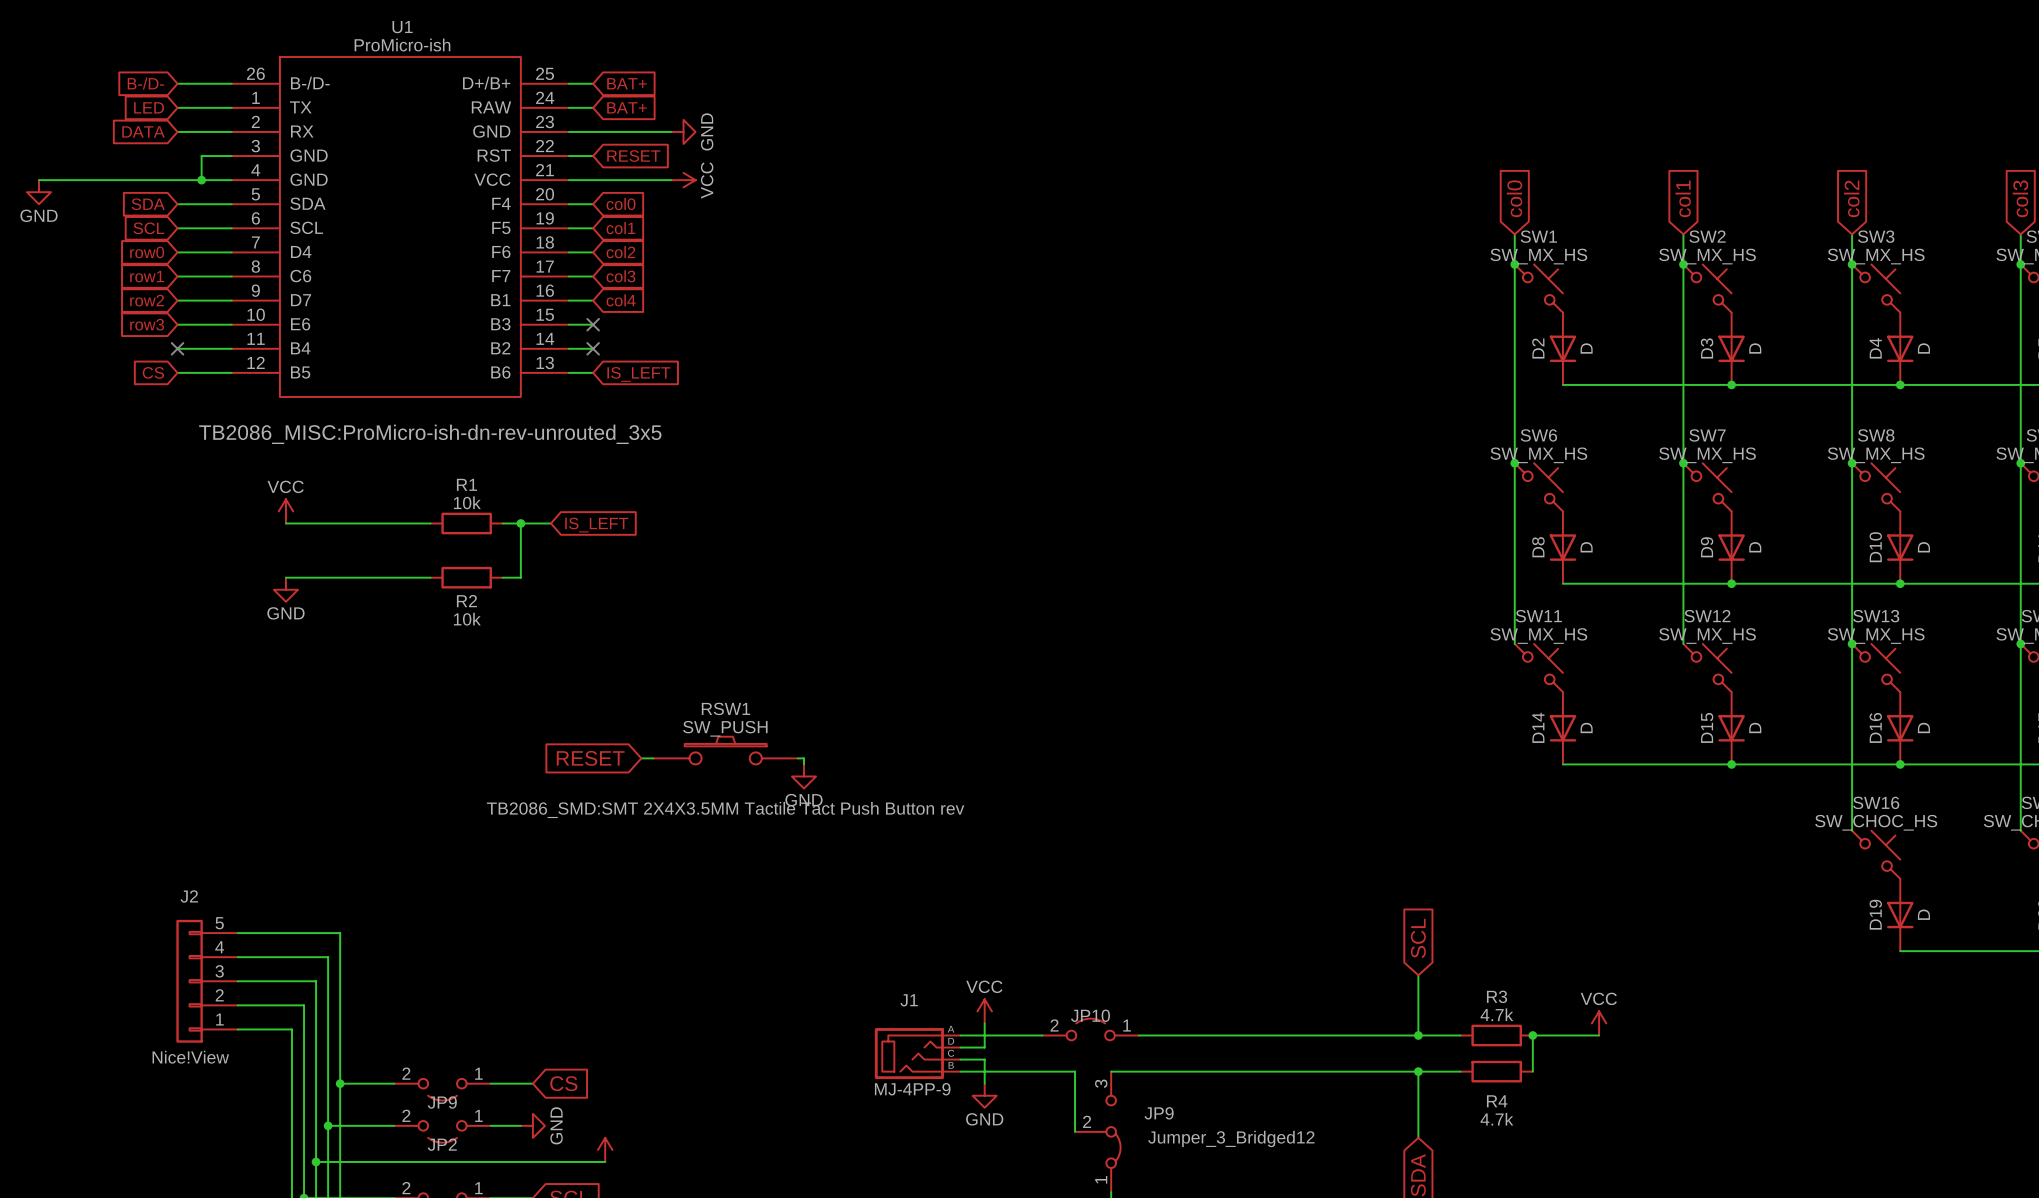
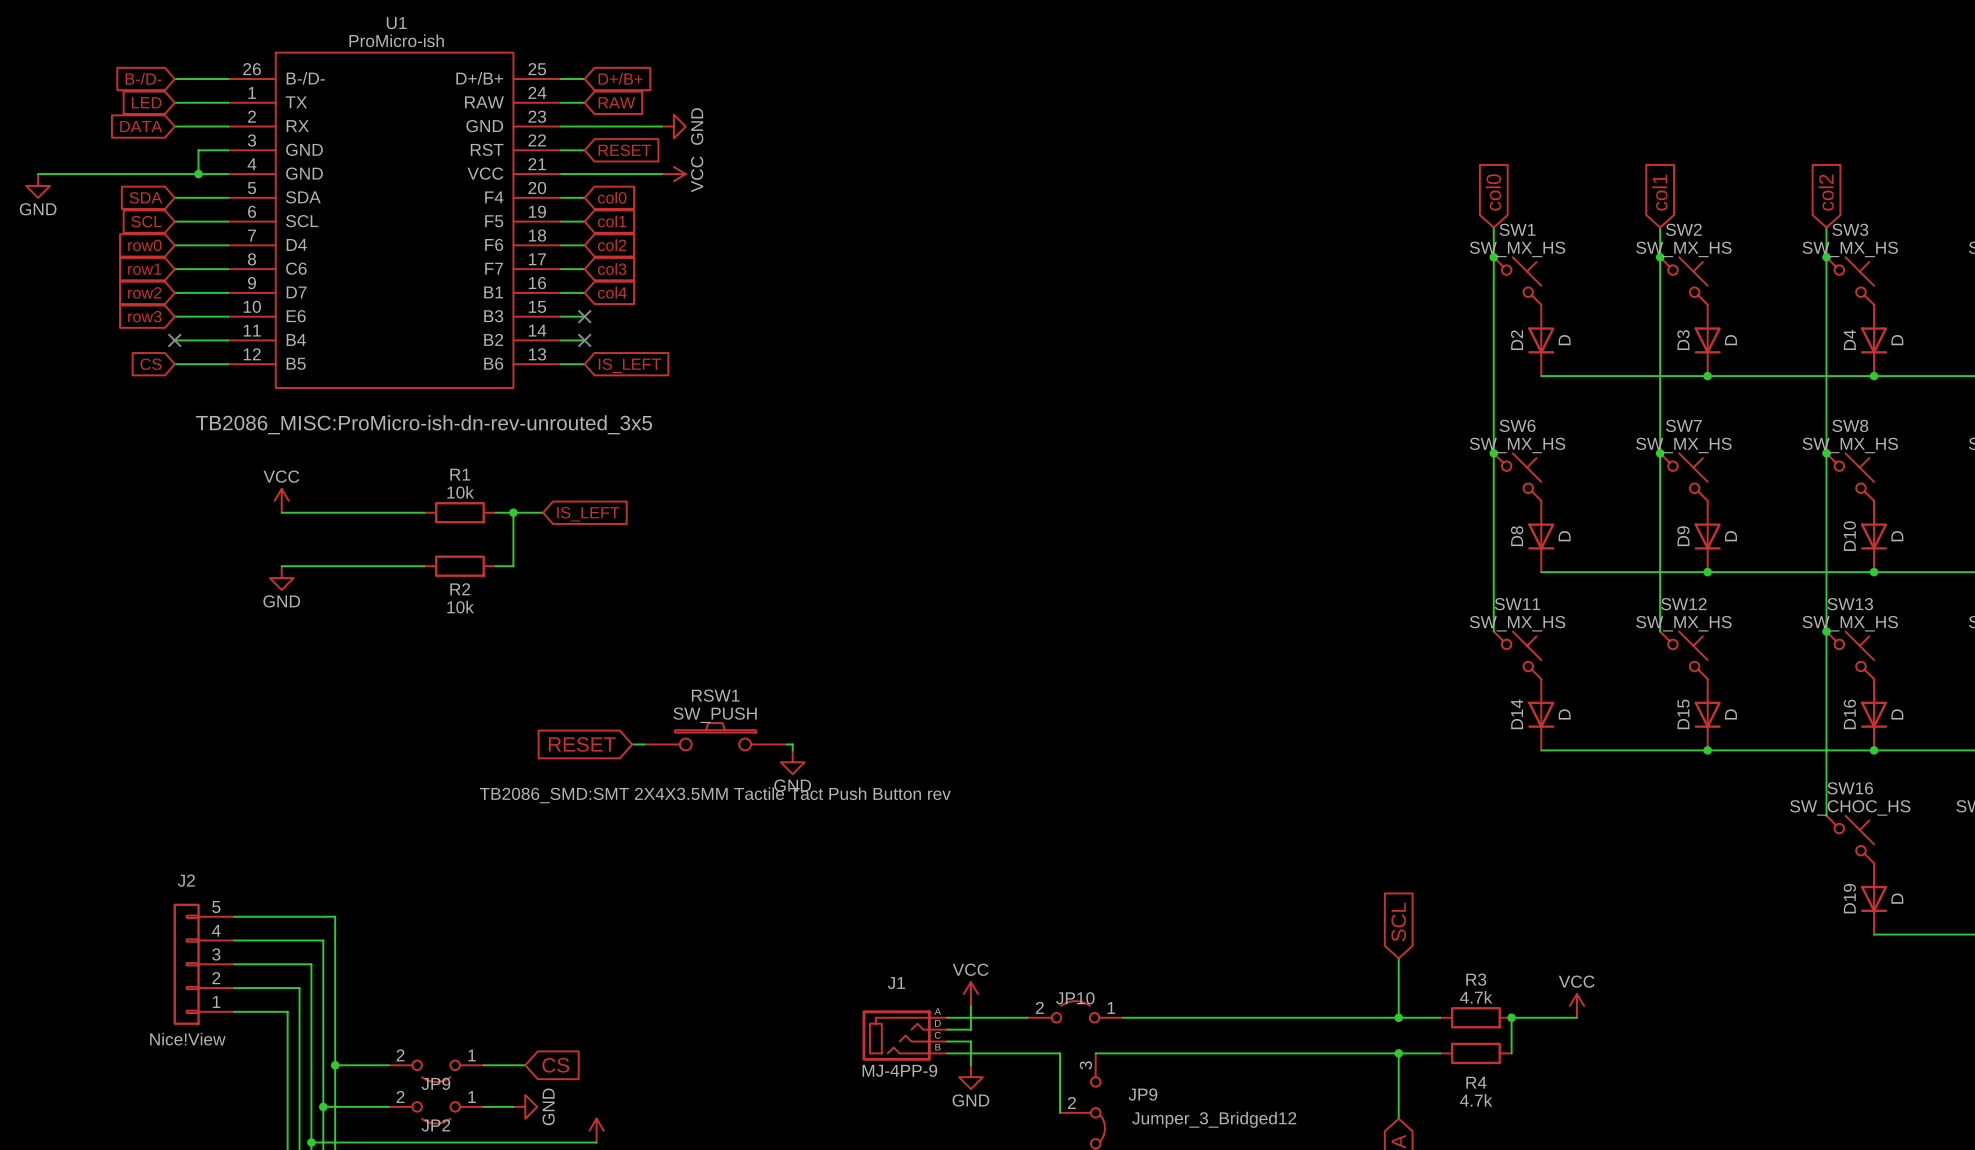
global label: BAT+ (626, 83) -> D+/B+ (620, 78)
global label: BAT+ (626, 107) -> RAW (616, 102)

